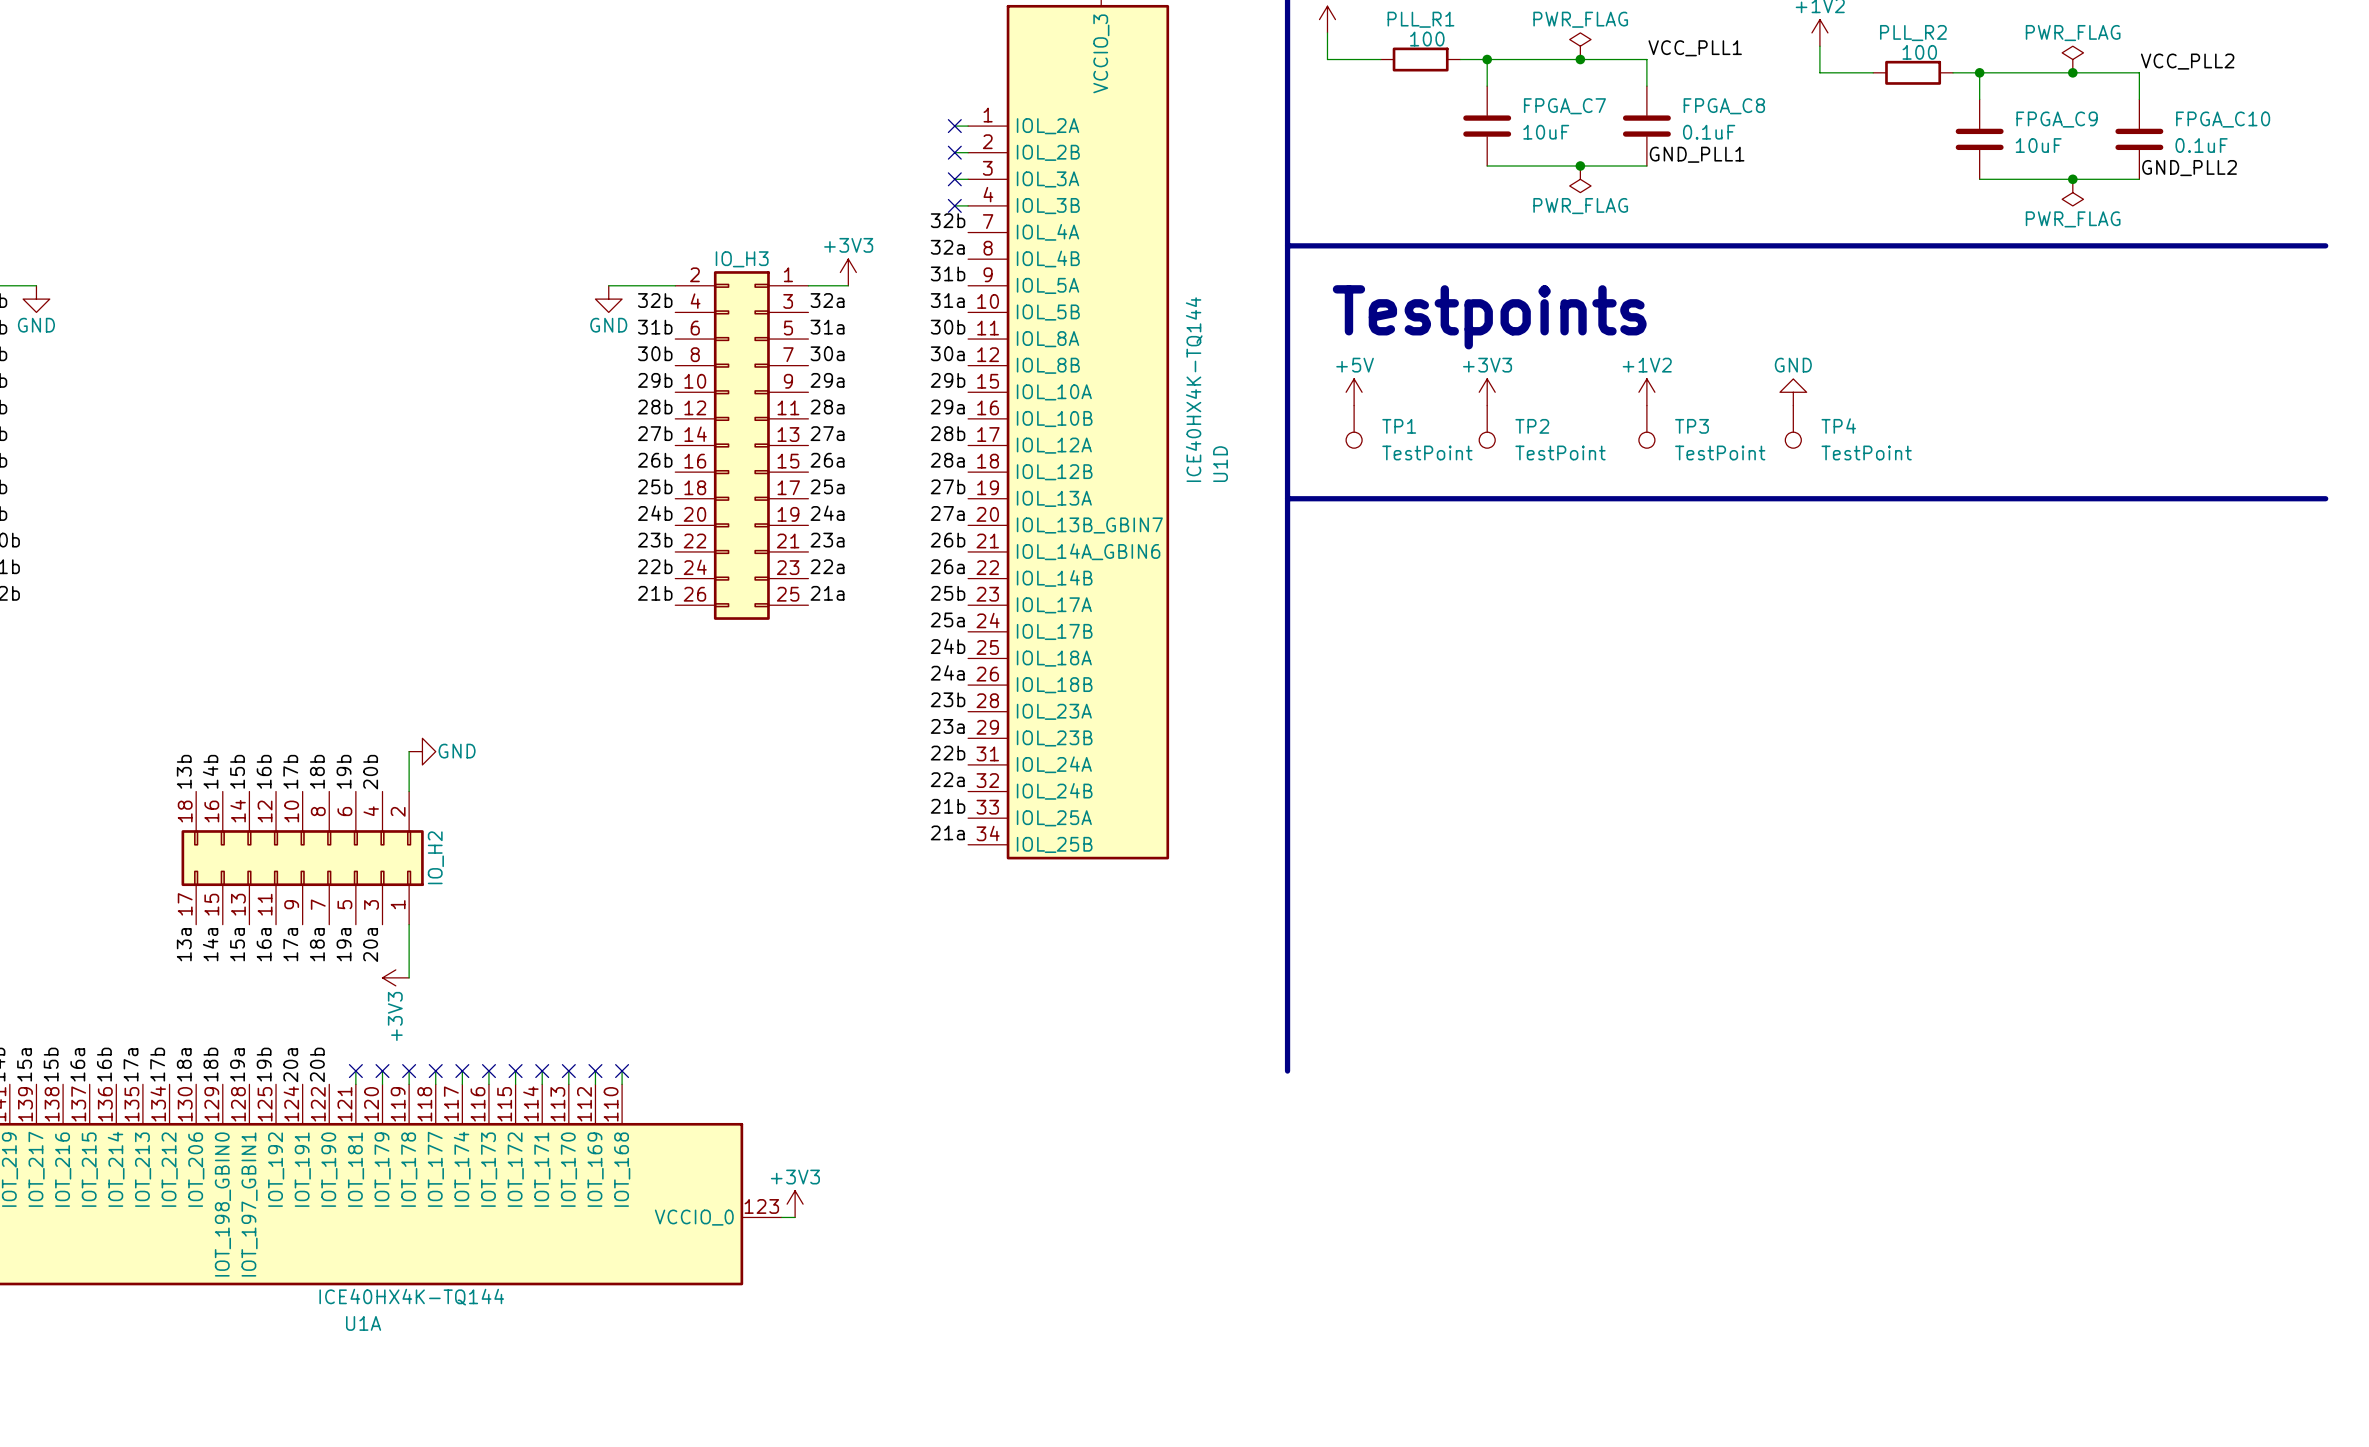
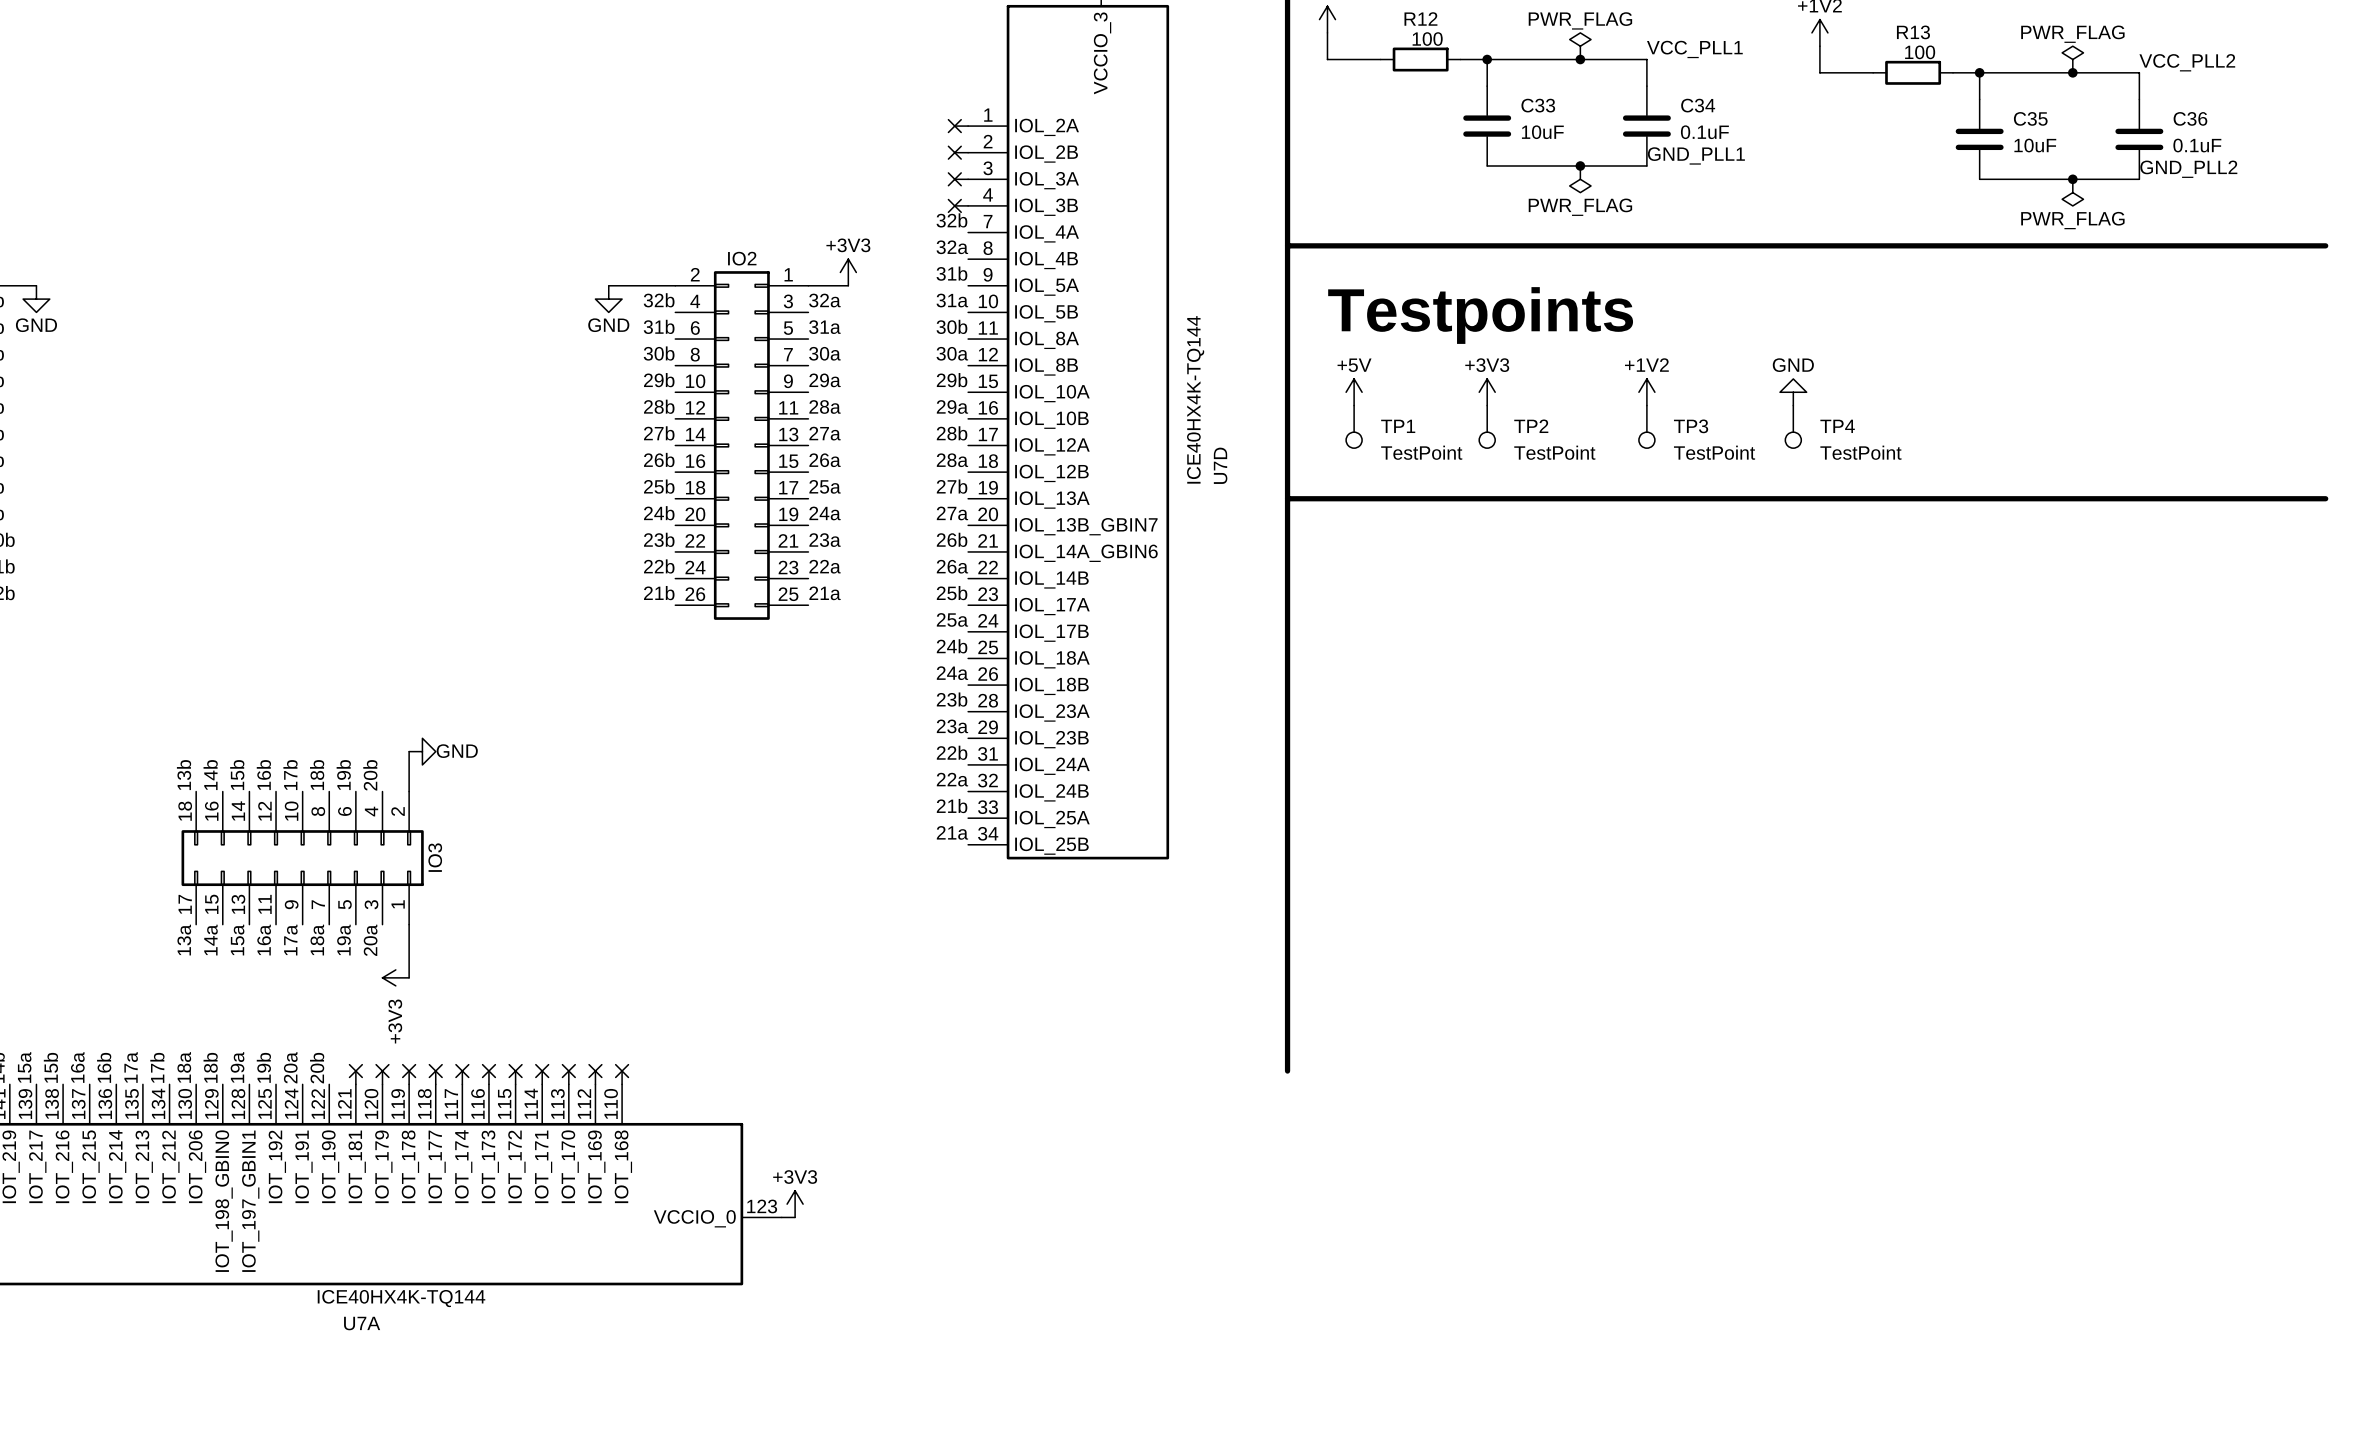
PLL_R1 name: PLL_R1 (1420, 19) -> R12 (1420, 18)
PLL_R2 name: PLL_R2 (1913, 33) -> R13 (1913, 32)
FPGA_C7 name: FPGA_C7 (1564, 106) -> C33 (1538, 105)
FPGA_C8 name: FPGA_C8 (1724, 106) -> C34 (1698, 105)
FPGA_C9 name: FPGA_C9 (2057, 119) -> C35 (2030, 118)
FPGA_C10 name: FPGA_C10 (2223, 119) -> C36 (2190, 118)
IO_H3 name: IO_H3 (742, 259) -> IO2 (742, 258)
U1D name: U1D (1220, 464) -> U7D (1220, 465)
IO_H2 name: IO_H2 (435, 857) -> IO3 (435, 857)
U1A name: U1A (363, 1323) -> U7A (362, 1323)

